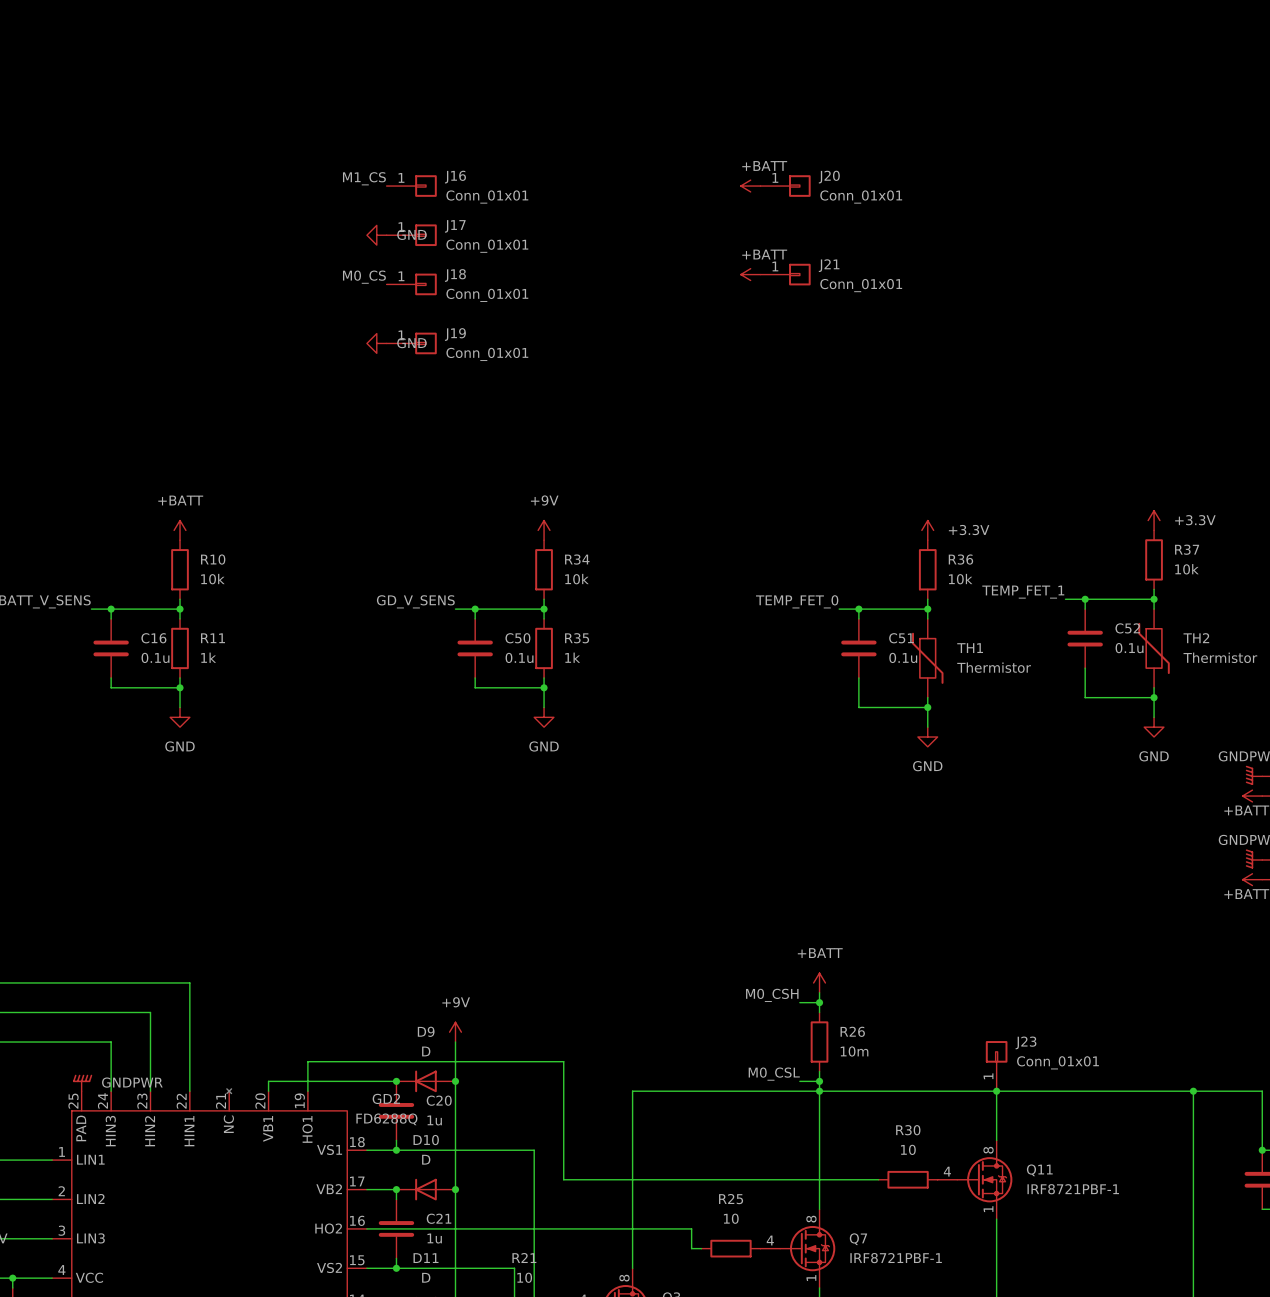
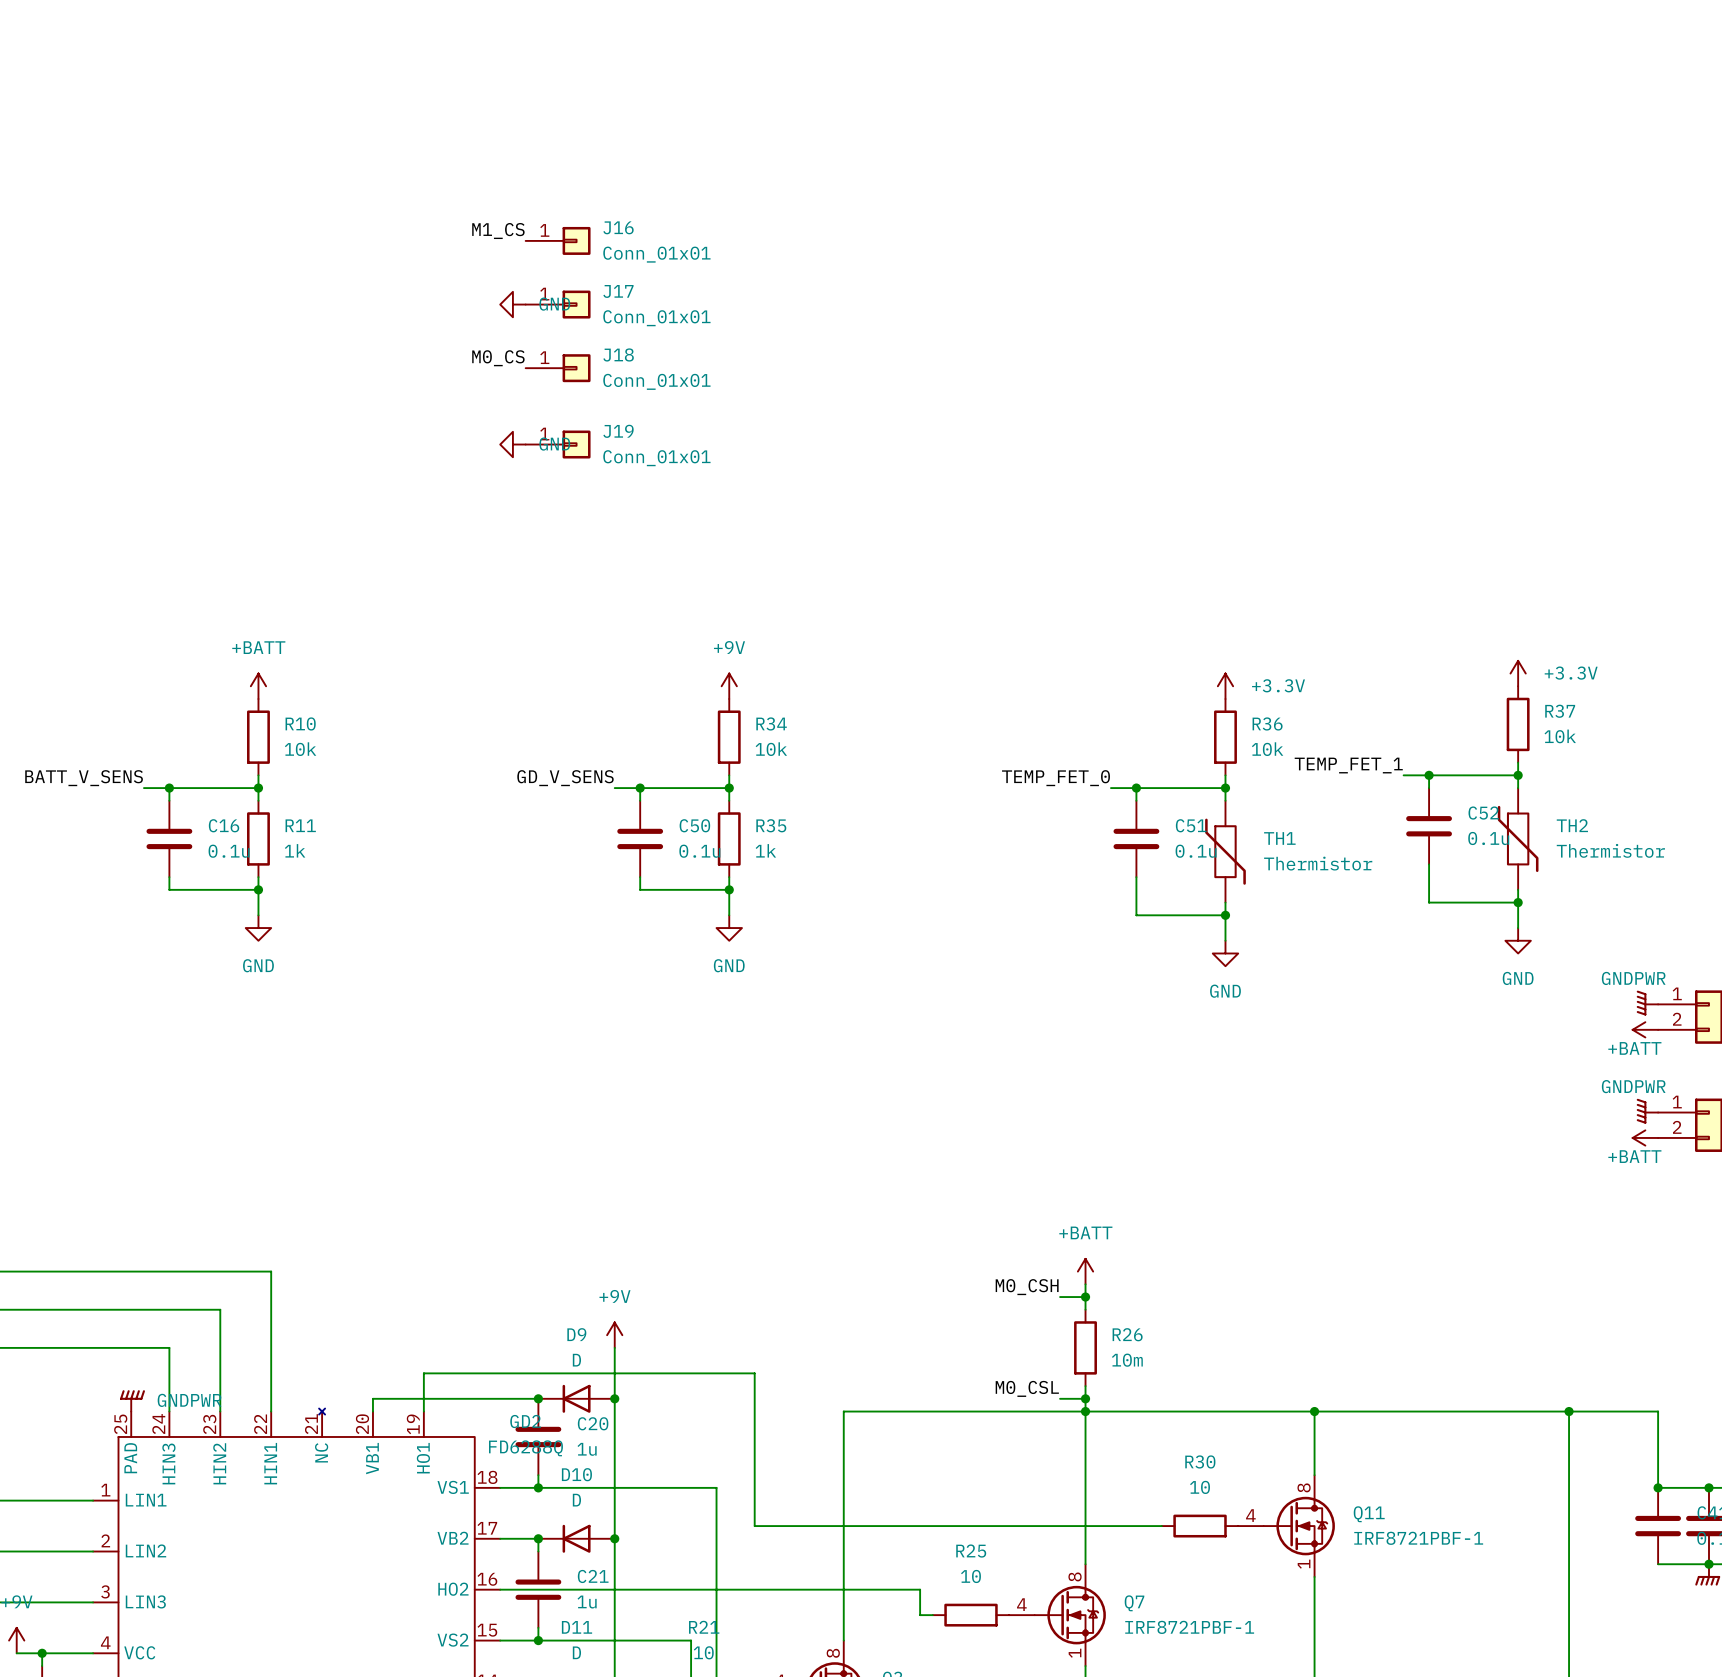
power symbol: +BATT (750, 186) -> none
J20: Conn_01x01 (785, 186) -> none
power symbol: +BATT (750, 274) -> none
J21: Conn_01x01 (785, 274) -> none
J23: Conn_01x01 (996, 1066) -> none

